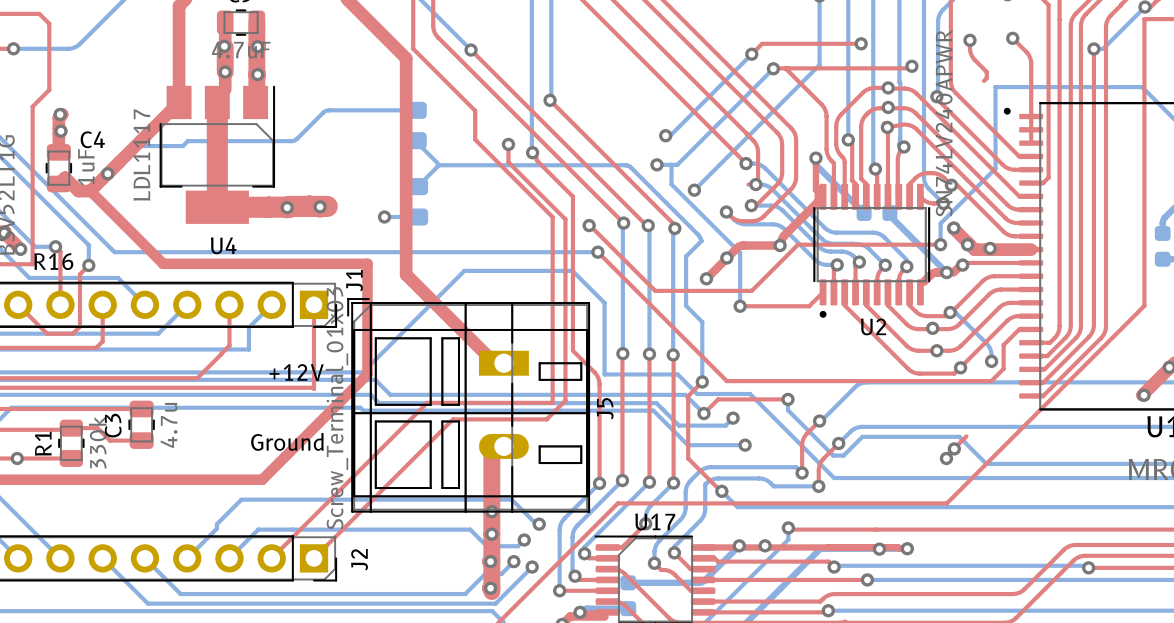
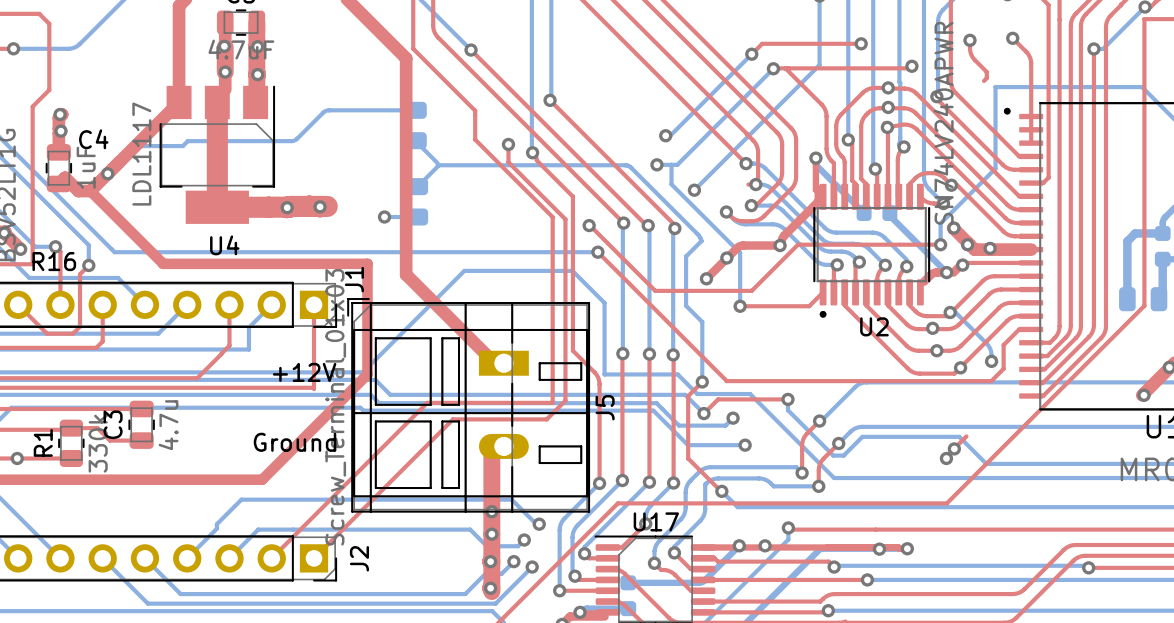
bottom track: none -> (1162, 233) (1135, 233) (1127, 241) (1127, 299)
bottom track: none -> (1162, 259) (1162, 295) (1158, 299)
part: none -> (1143, 299)

